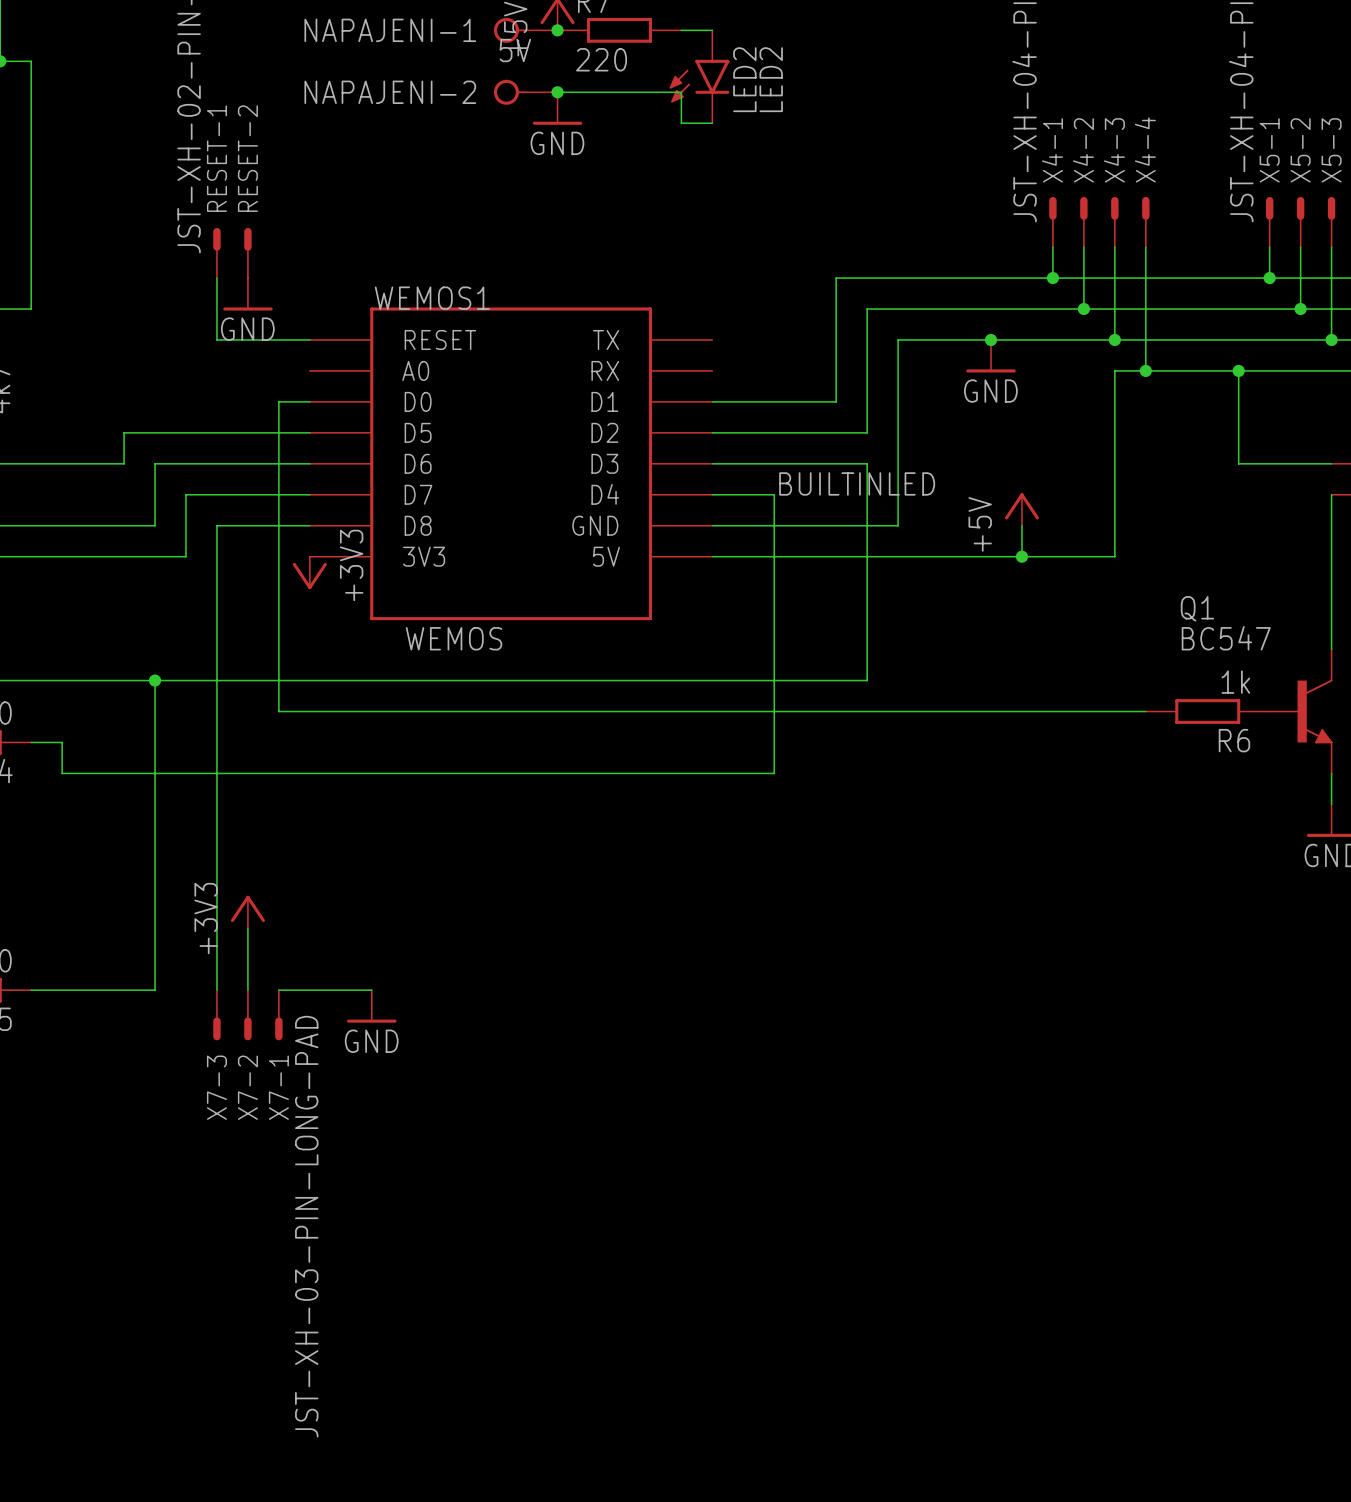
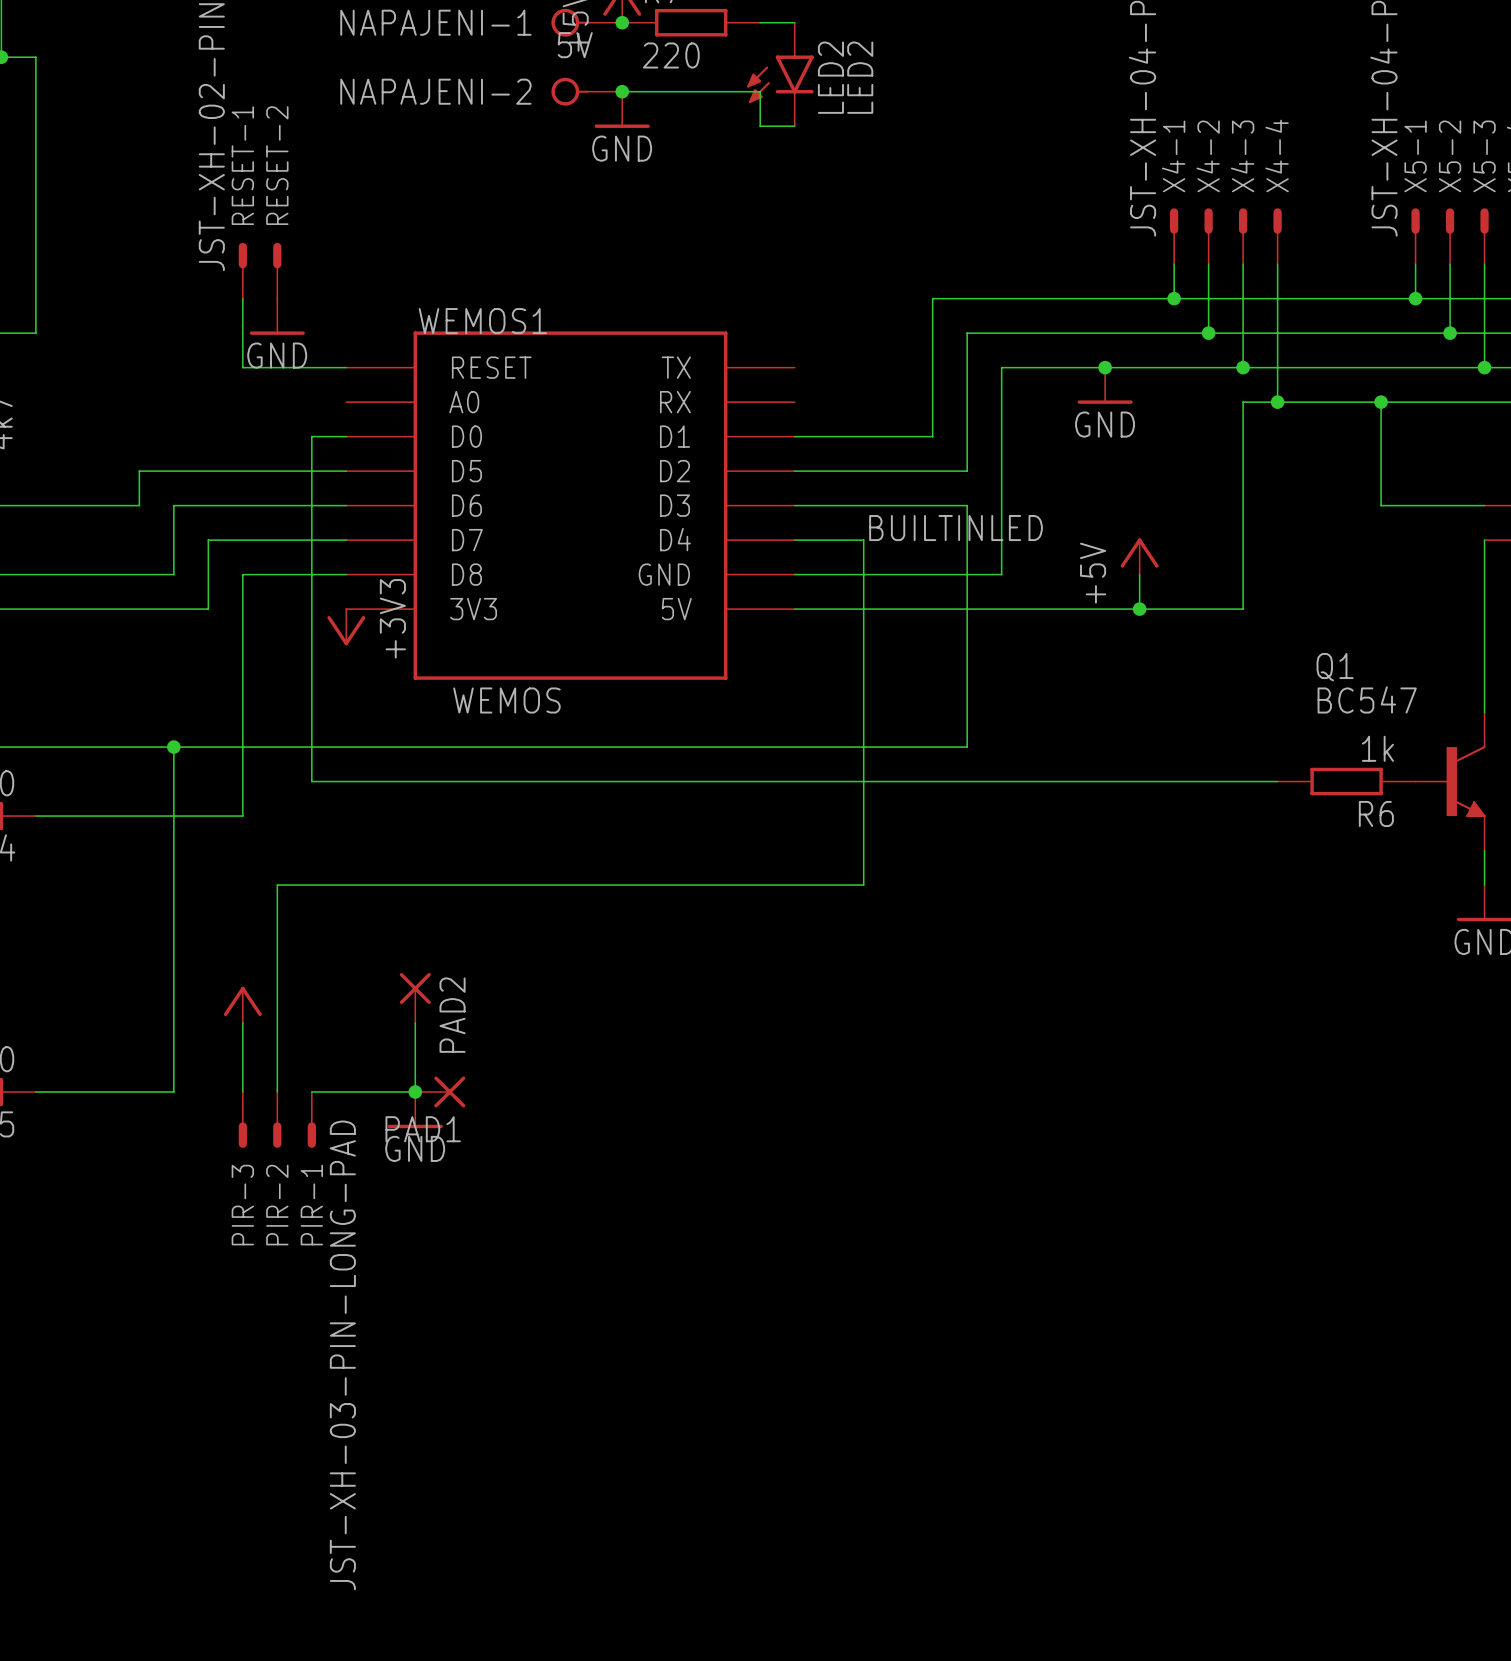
wire: (62, 742) (62, 773) (774, 773) -> (277, 1022) (277, 885) (863, 885) (863, 850)
wire: (216, 742) (216, 928) -> (242, 816) (70, 816)
PAD2: none -> (415, 997)
power symbol: none -> (242, 1004)
power symbol: +3V3 (247, 911) -> none
wire: none -> (415, 1022) (415, 1091)
junction: none -> (415, 1091)
PAD1: none -> (440, 1091)
X7-3 name: X7-3 (216, 1087) -> PIR-3 (242, 1205)
X7-2 name: X7-2 (247, 1087) -> PIR-2 (277, 1205)
X7-1 name: X7-1 (278, 1087) -> PIR-1 (311, 1205)

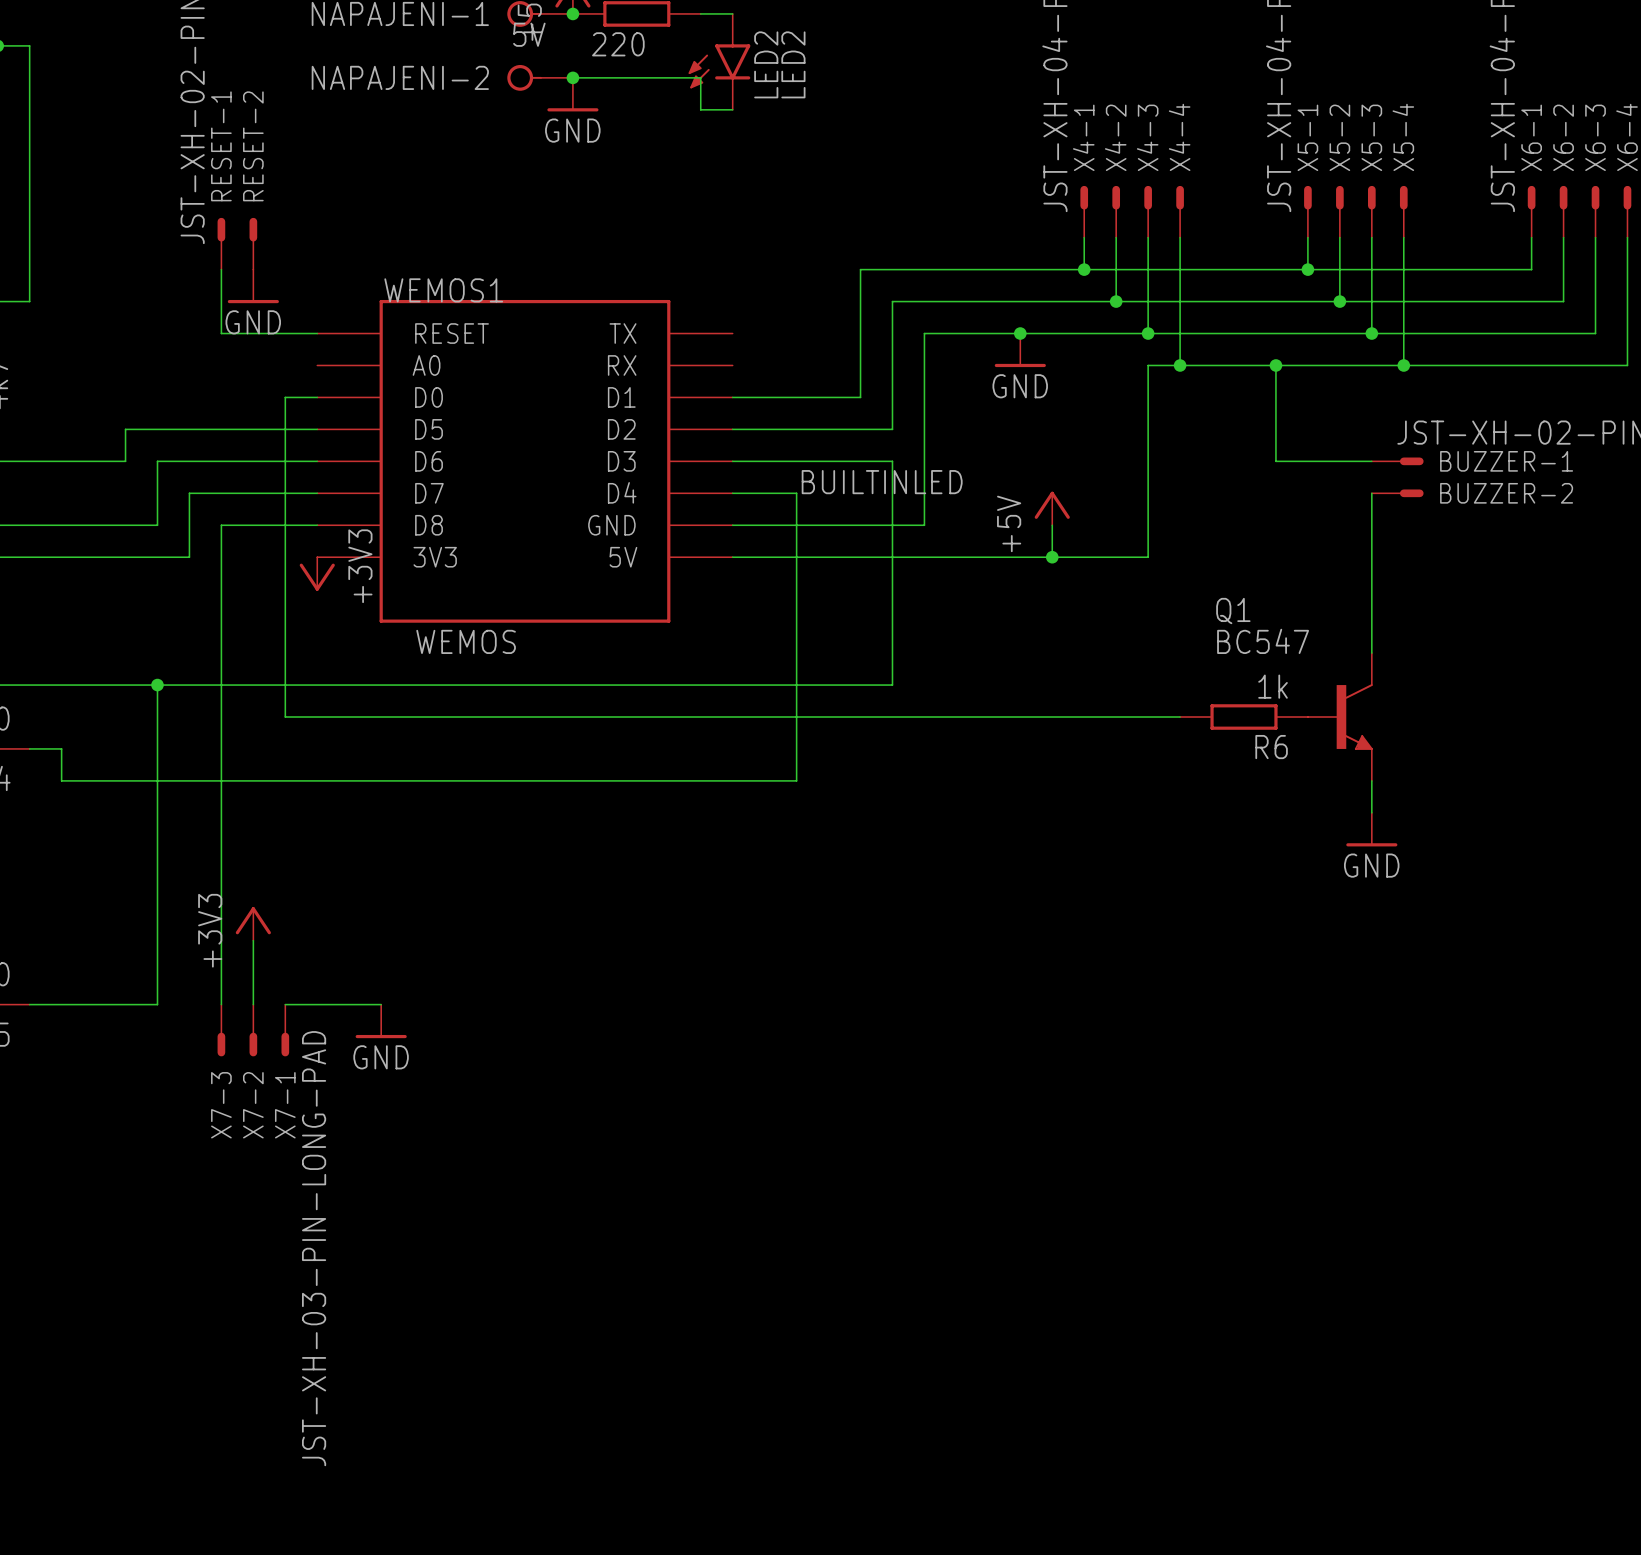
wire: (70, 816) (242, 816) -> (221, 940) (221, 748)
wire: (863, 850) (863, 885) (277, 885) (277, 1022) -> (796, 780) (61, 780) (61, 748)
PAD2: (415, 997) -> none
power symbol: (242, 1004) -> none
power symbol: none -> +3V3 (253, 923)
wire: (415, 1022) (415, 1091) -> none
junction: (415, 1091) -> none
PAD1: (440, 1091) -> none
PIR-3 name: PIR-3 (242, 1205) -> X7-3 (221, 1105)
PIR-2 name: PIR-2 (277, 1205) -> X7-2 (253, 1105)
PIR-1 name: PIR-1 (311, 1205) -> X7-1 (285, 1105)

